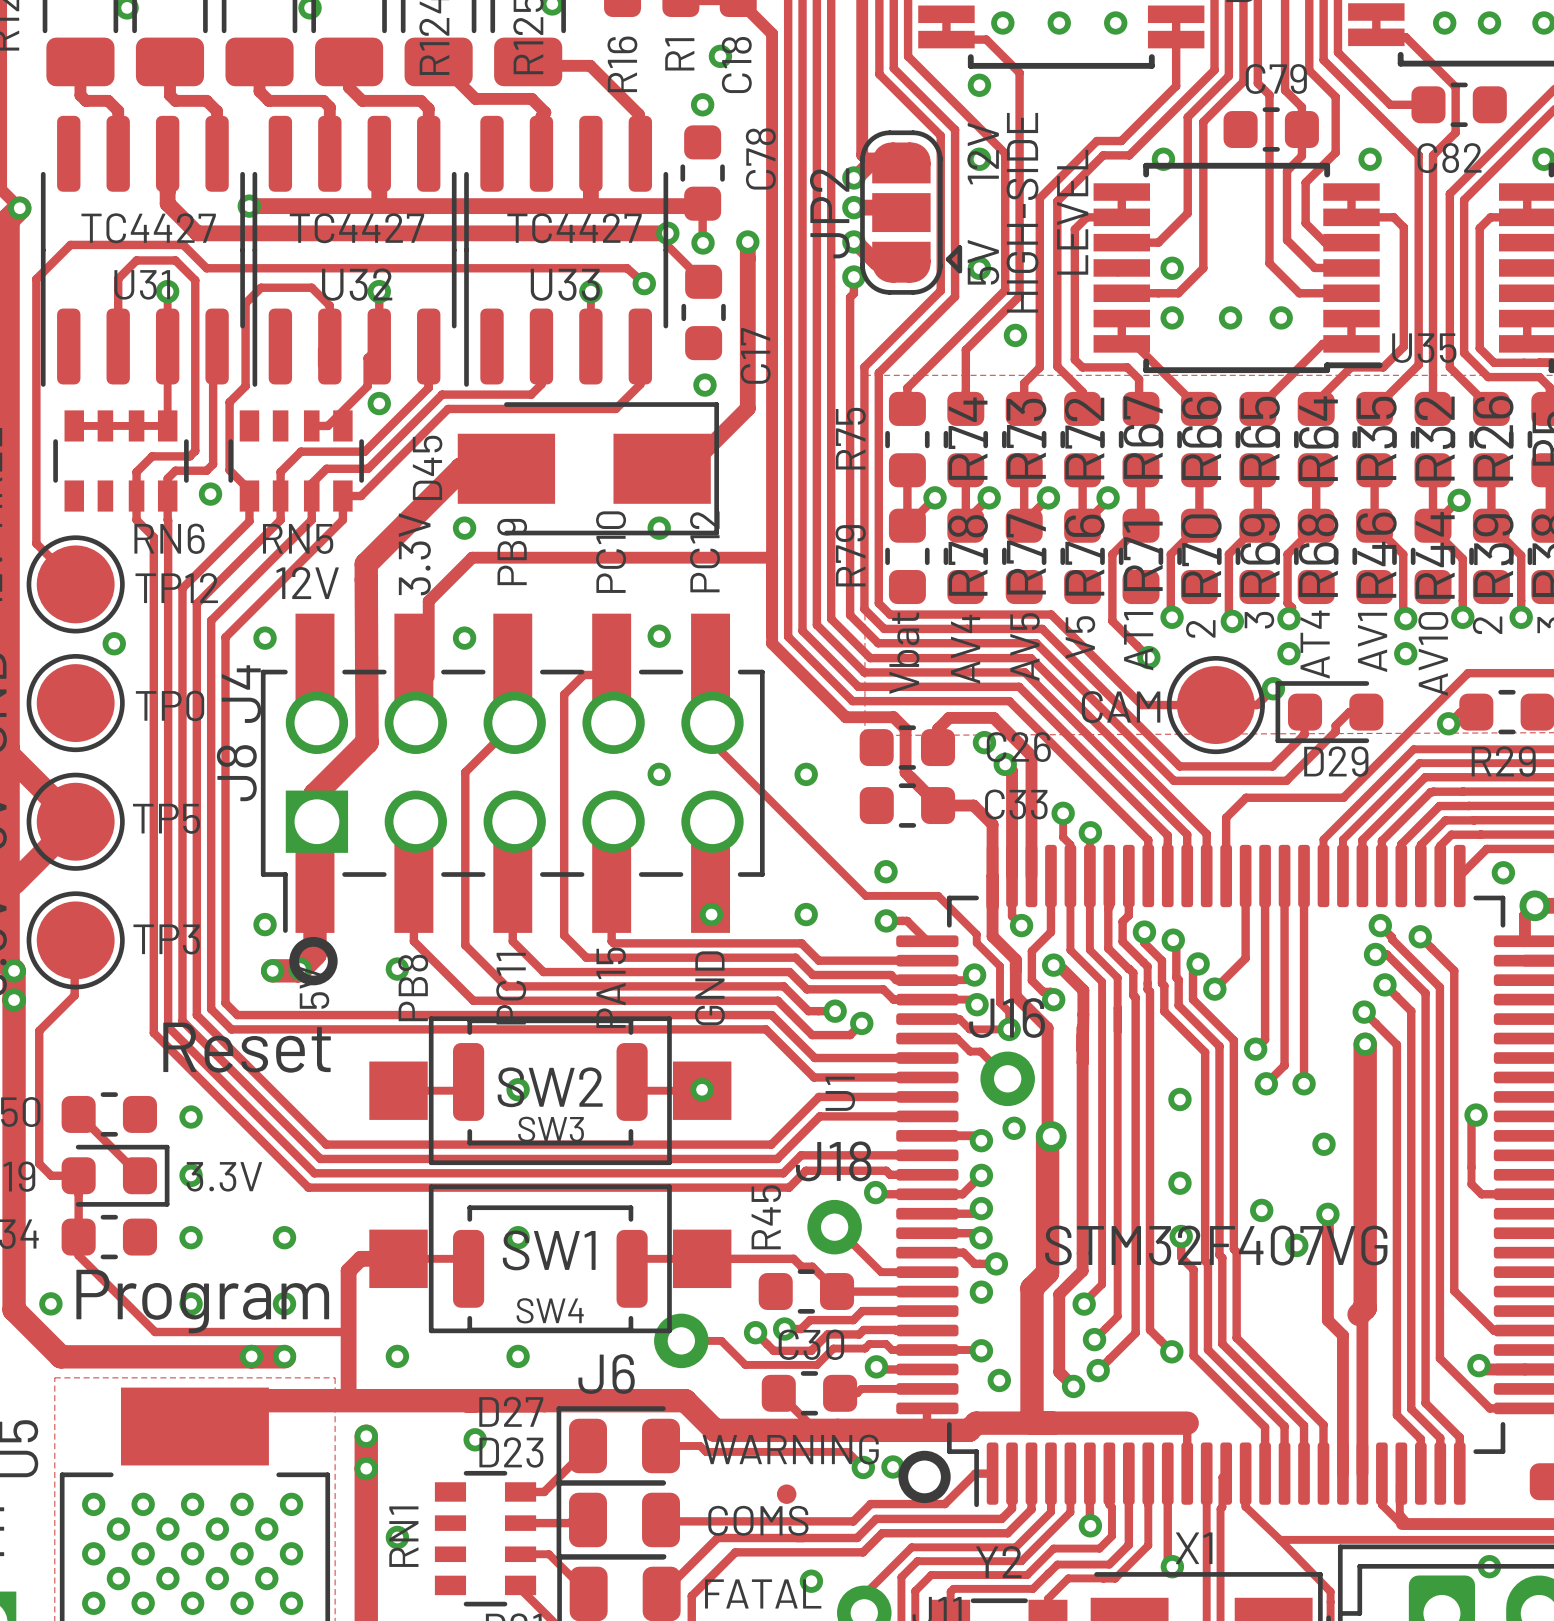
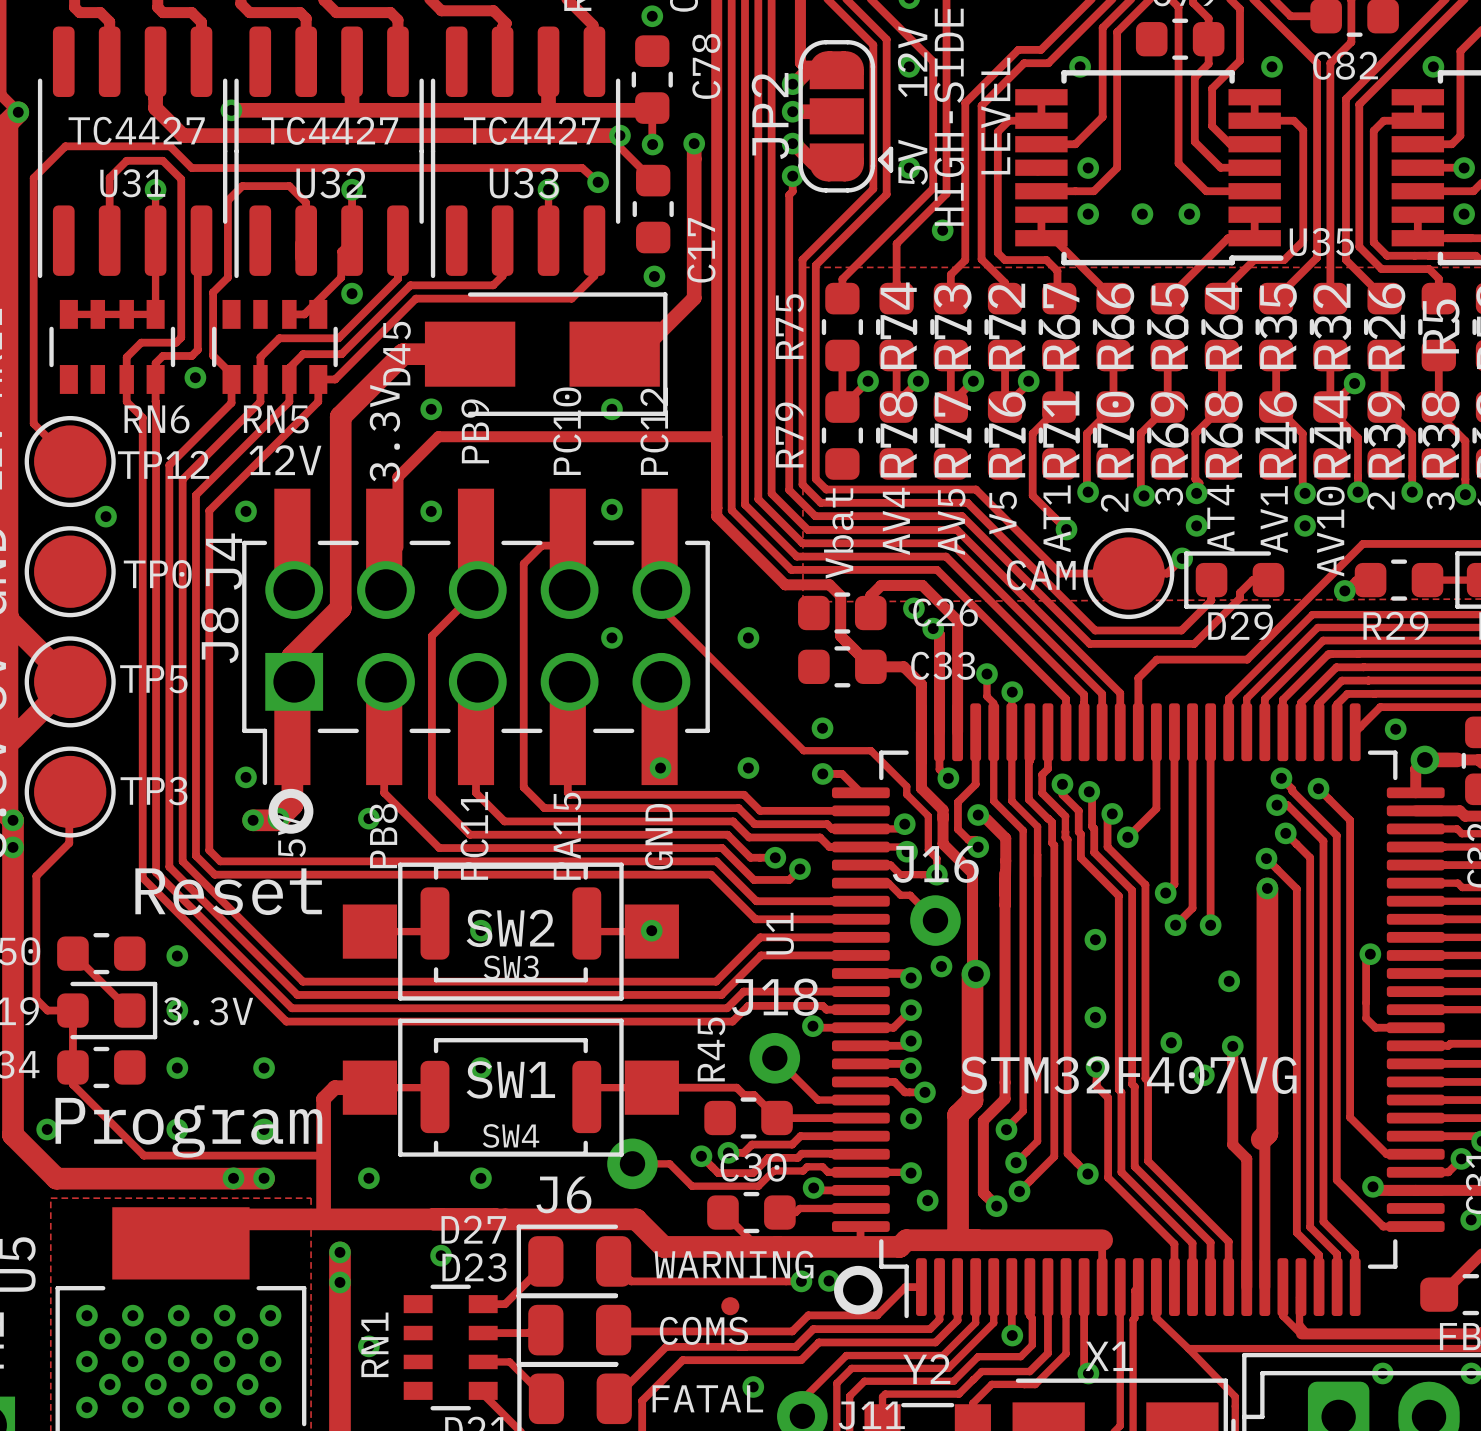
track: (461, 468) (366, 564) (367, 742) -> (428, 354) (403, 354) (340, 416) (340, 608)
track: (661, 1445) (700, 1445) (706, 1451) (847, 1451) (863, 1467) -> (613, 1263) (631, 1281) (801, 1281)

